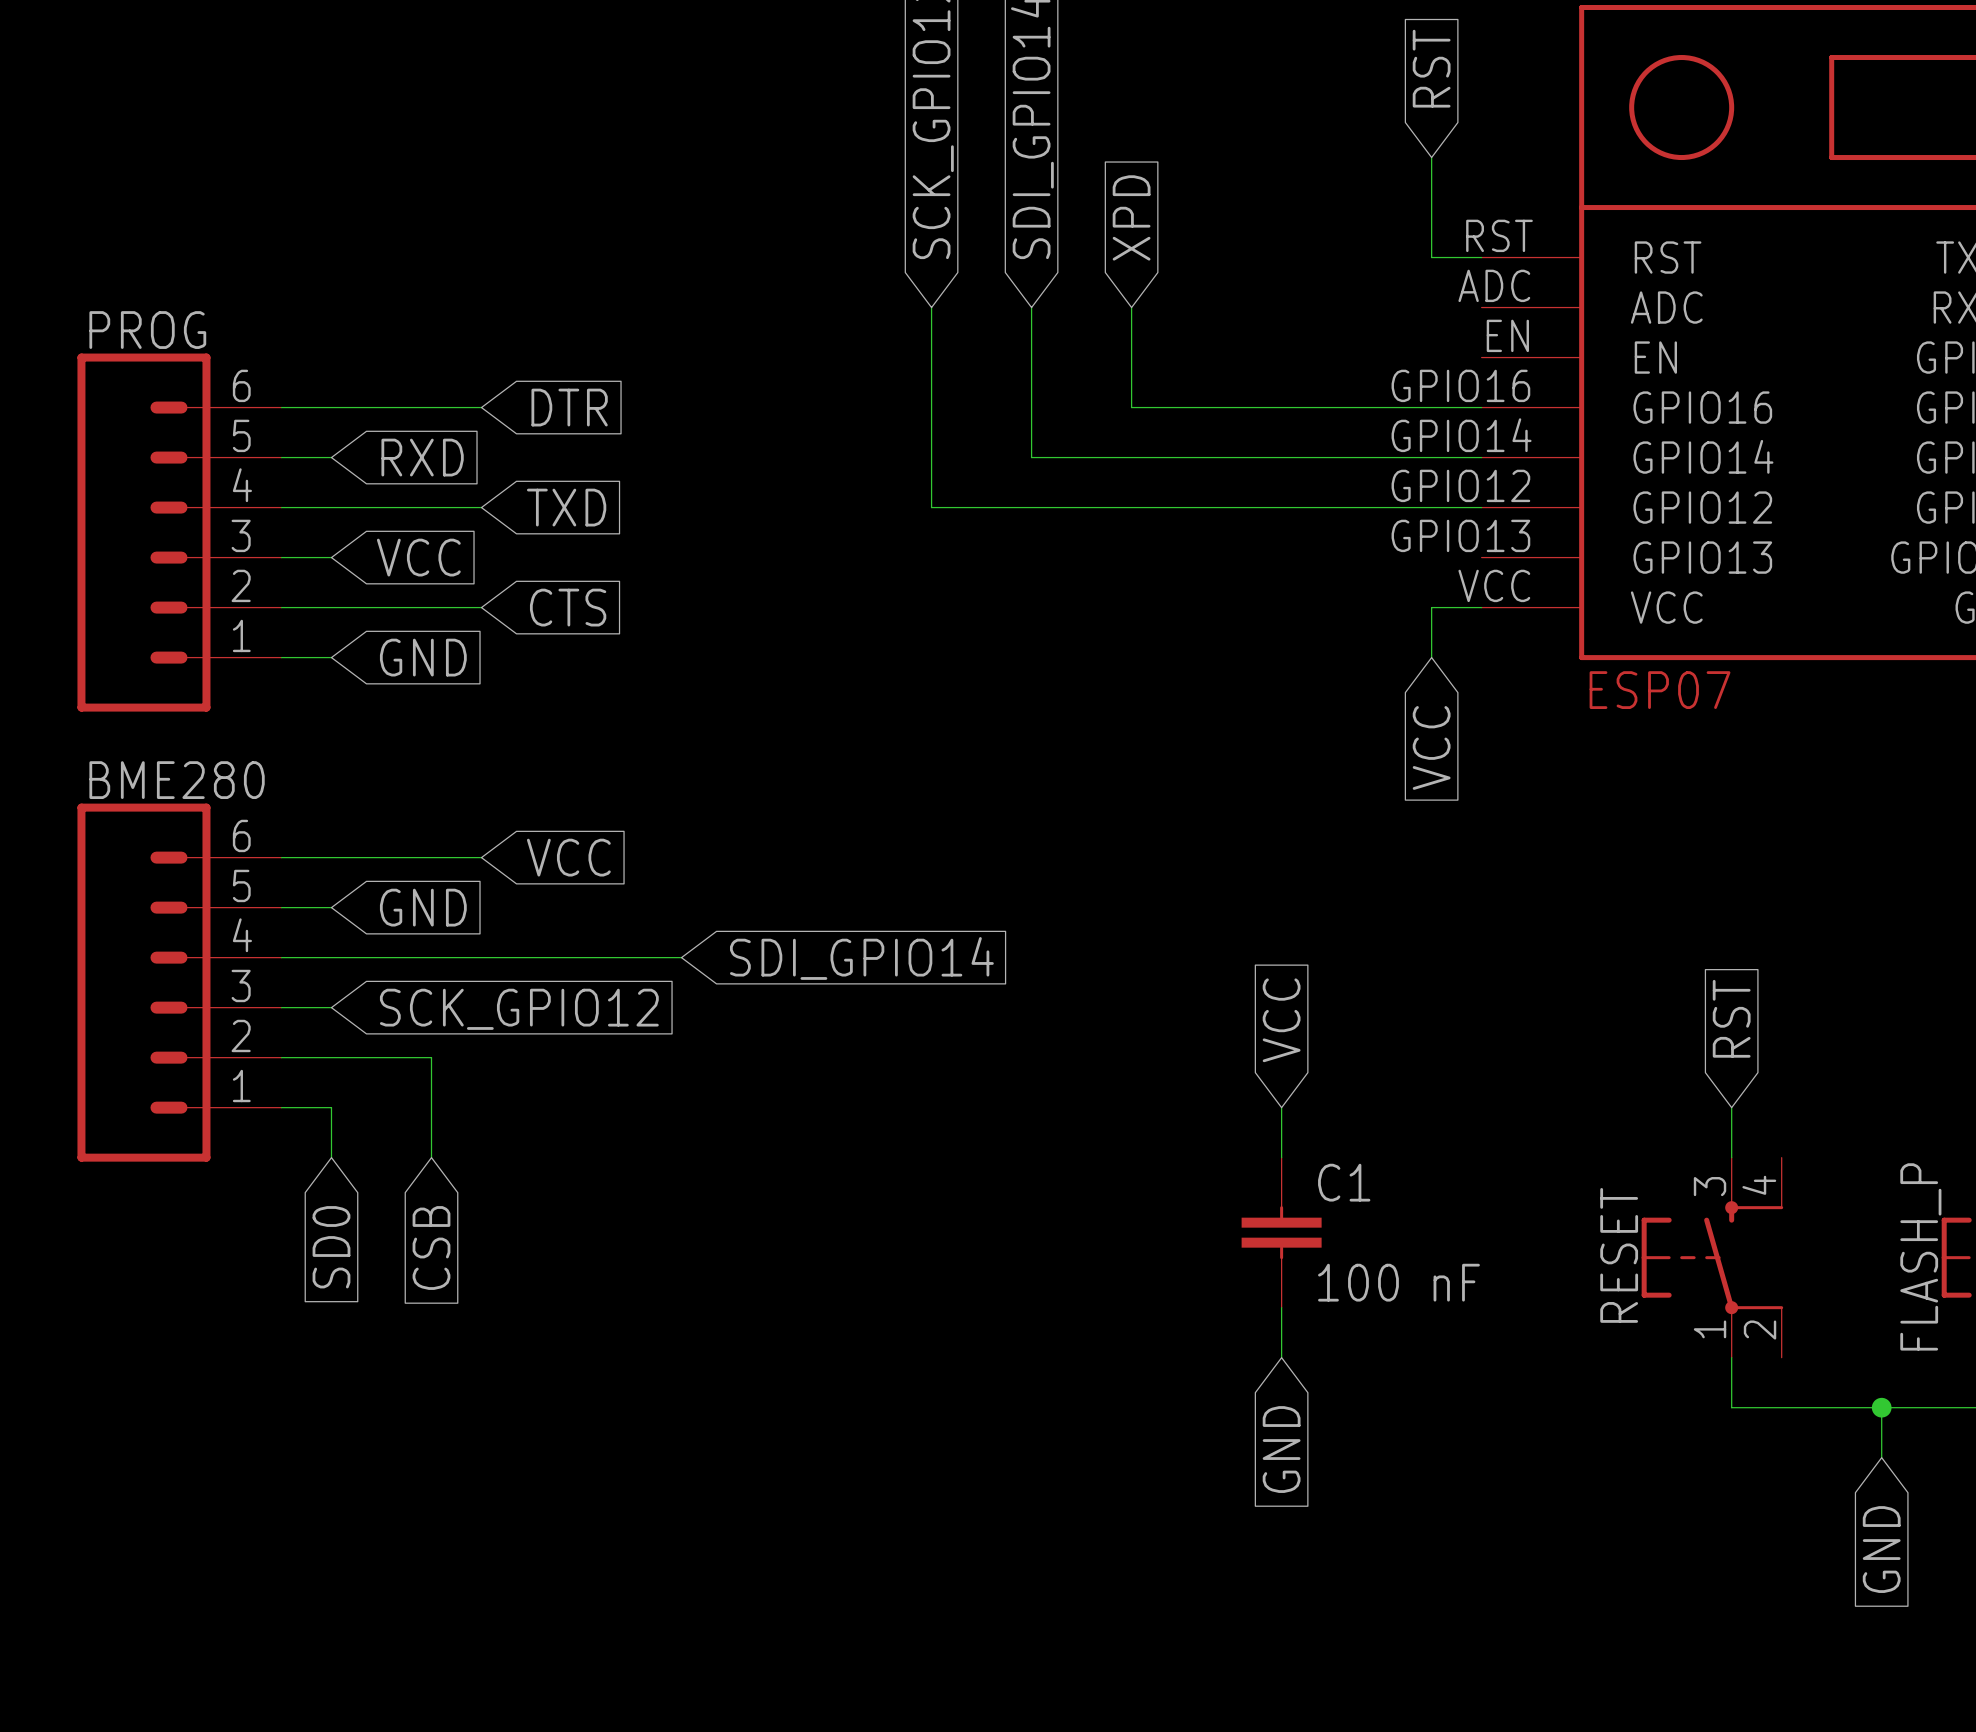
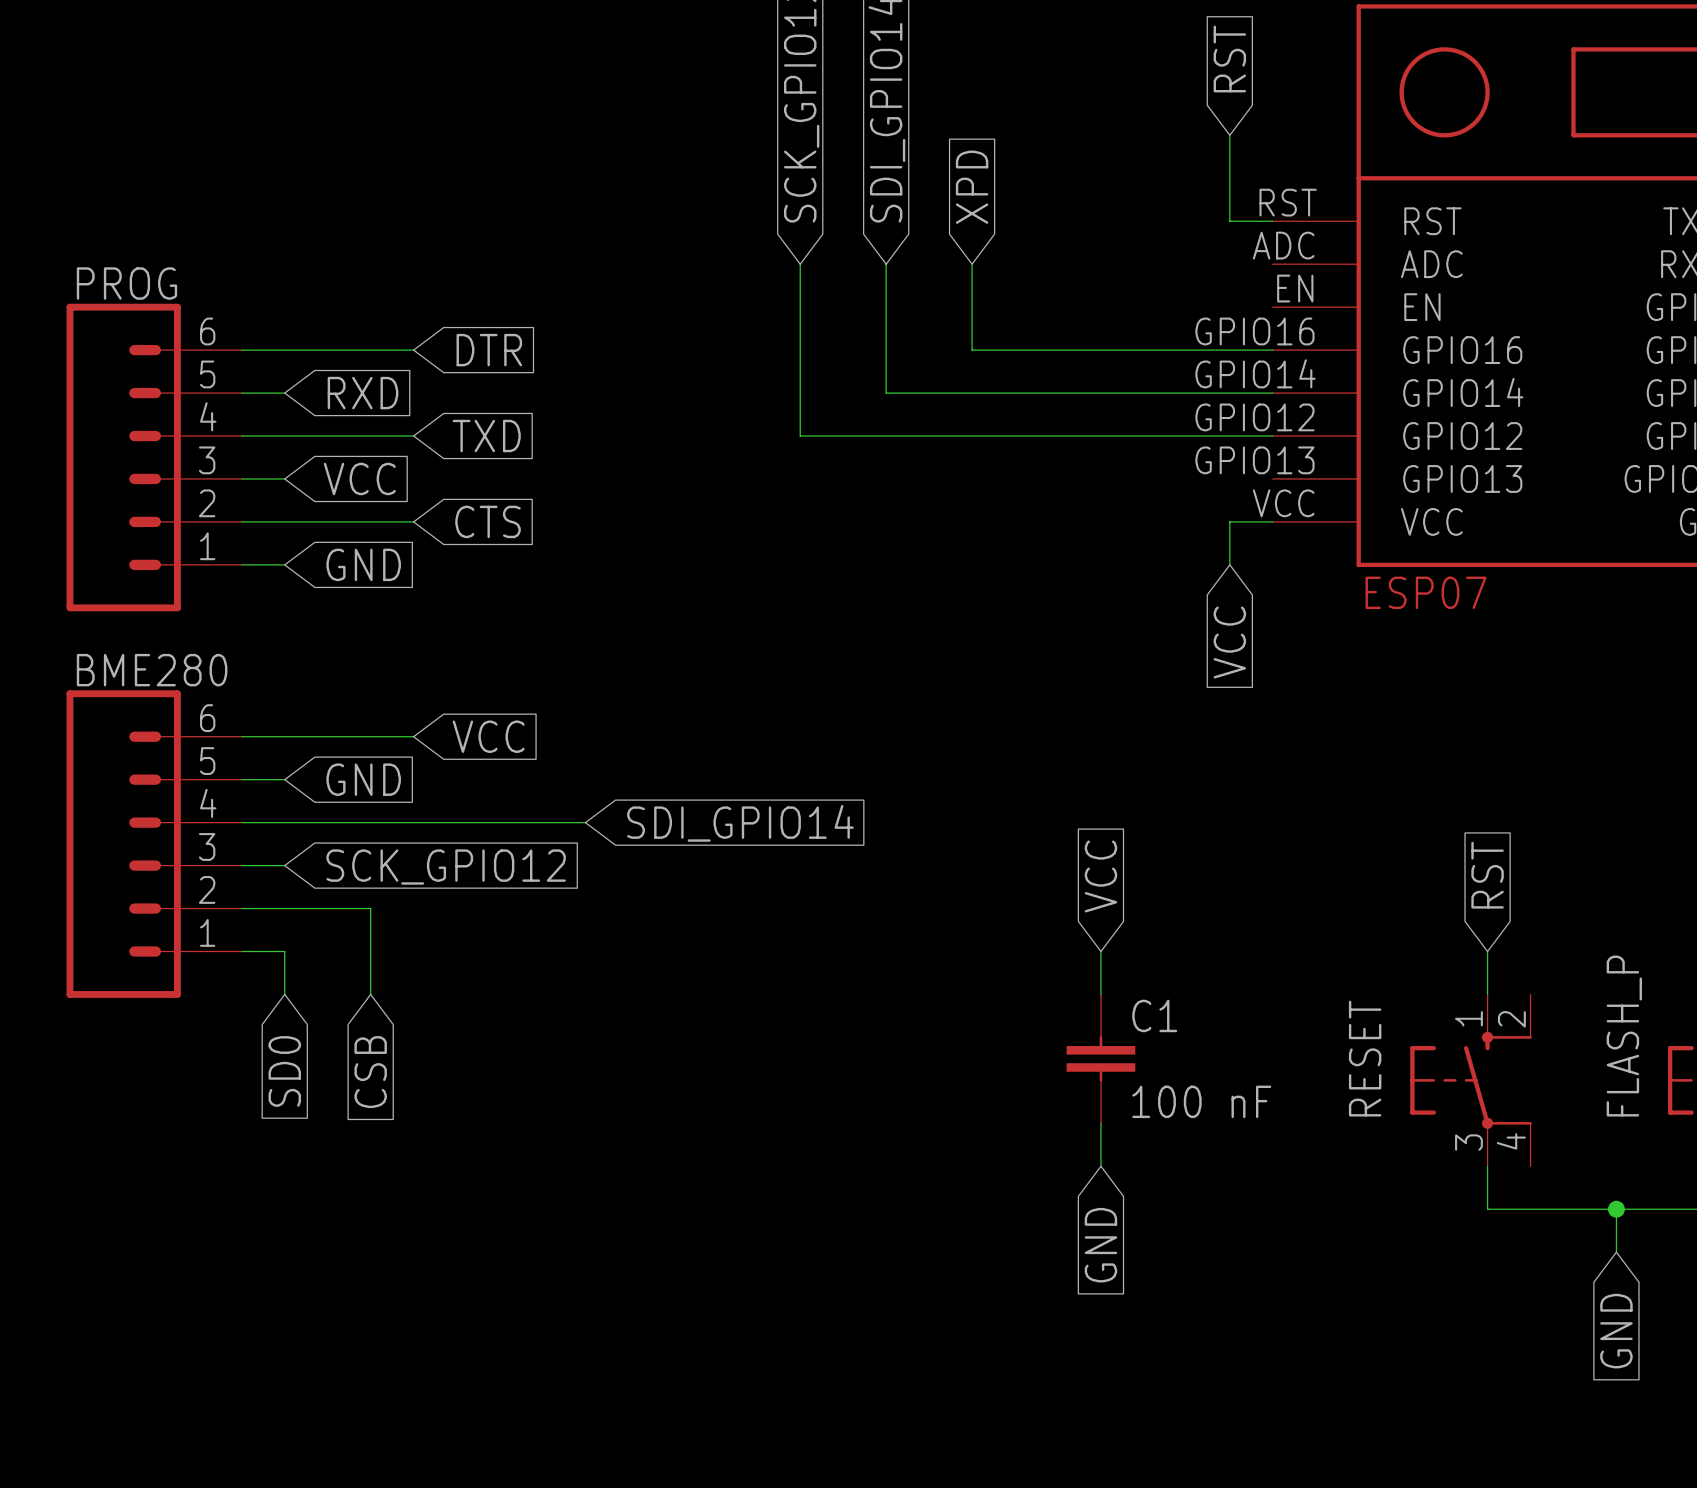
RESET pin number: 4 (1759, 1185) -> 2 (1511, 1019)
RESET pin number: 3 (1710, 1186) -> 1 (1468, 1018)
RESET name position: RESET (1619, 1255) -> RESET (1365, 1058)
FLASH_P name position: FLASH_P (1920, 1256) -> FLASH_P (1624, 1036)
RESET pin number: 1 (1710, 1329) -> 3 (1468, 1142)
RESET pin number: 2 (1760, 1330) -> 4 (1511, 1141)

